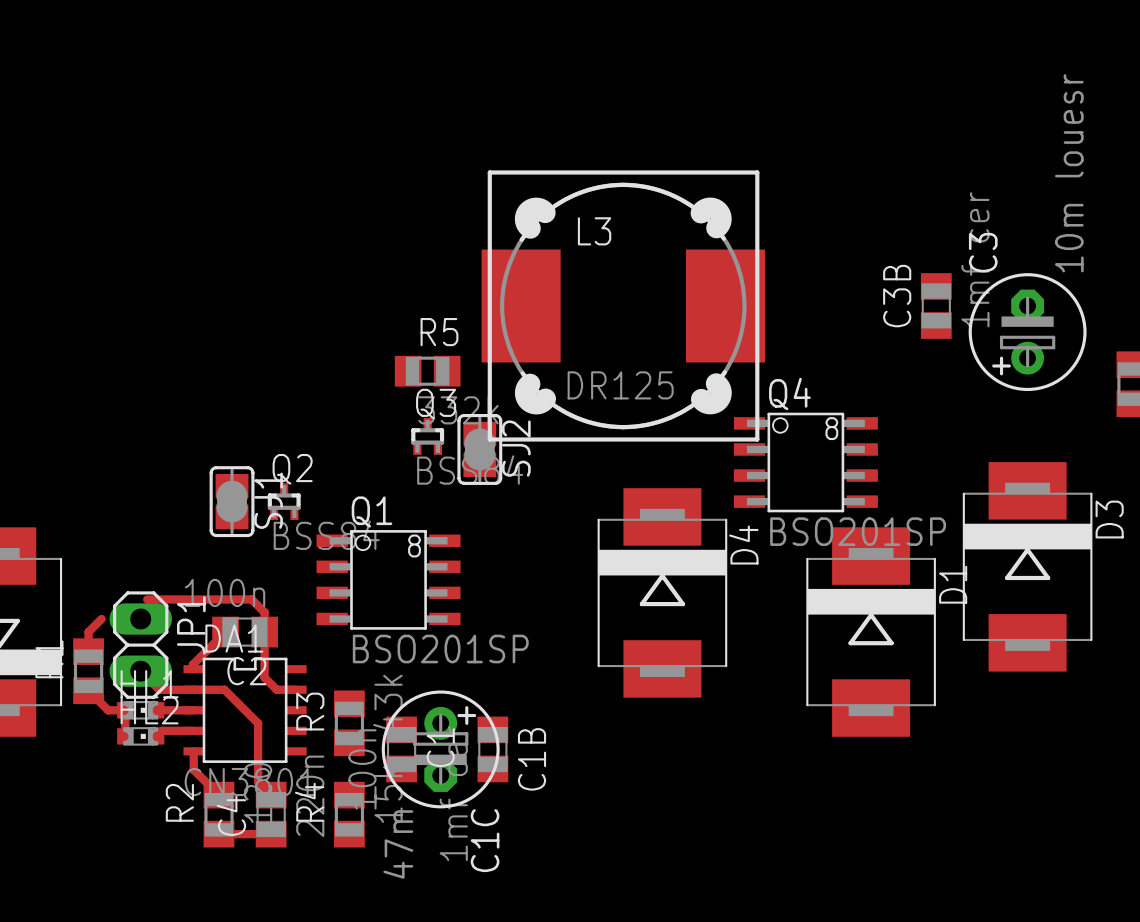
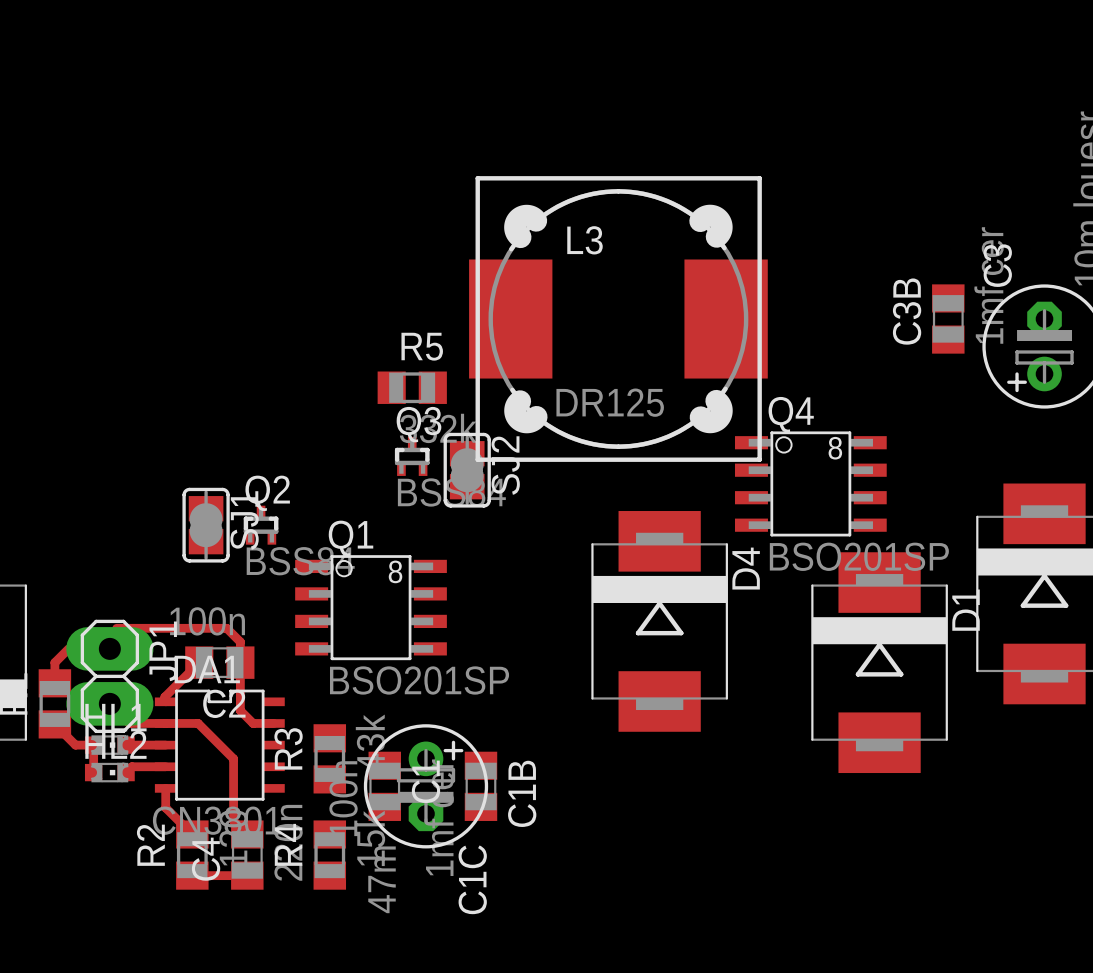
JP1 footprint: [109, 591, 173, 699] -> [66, 619, 154, 734]

